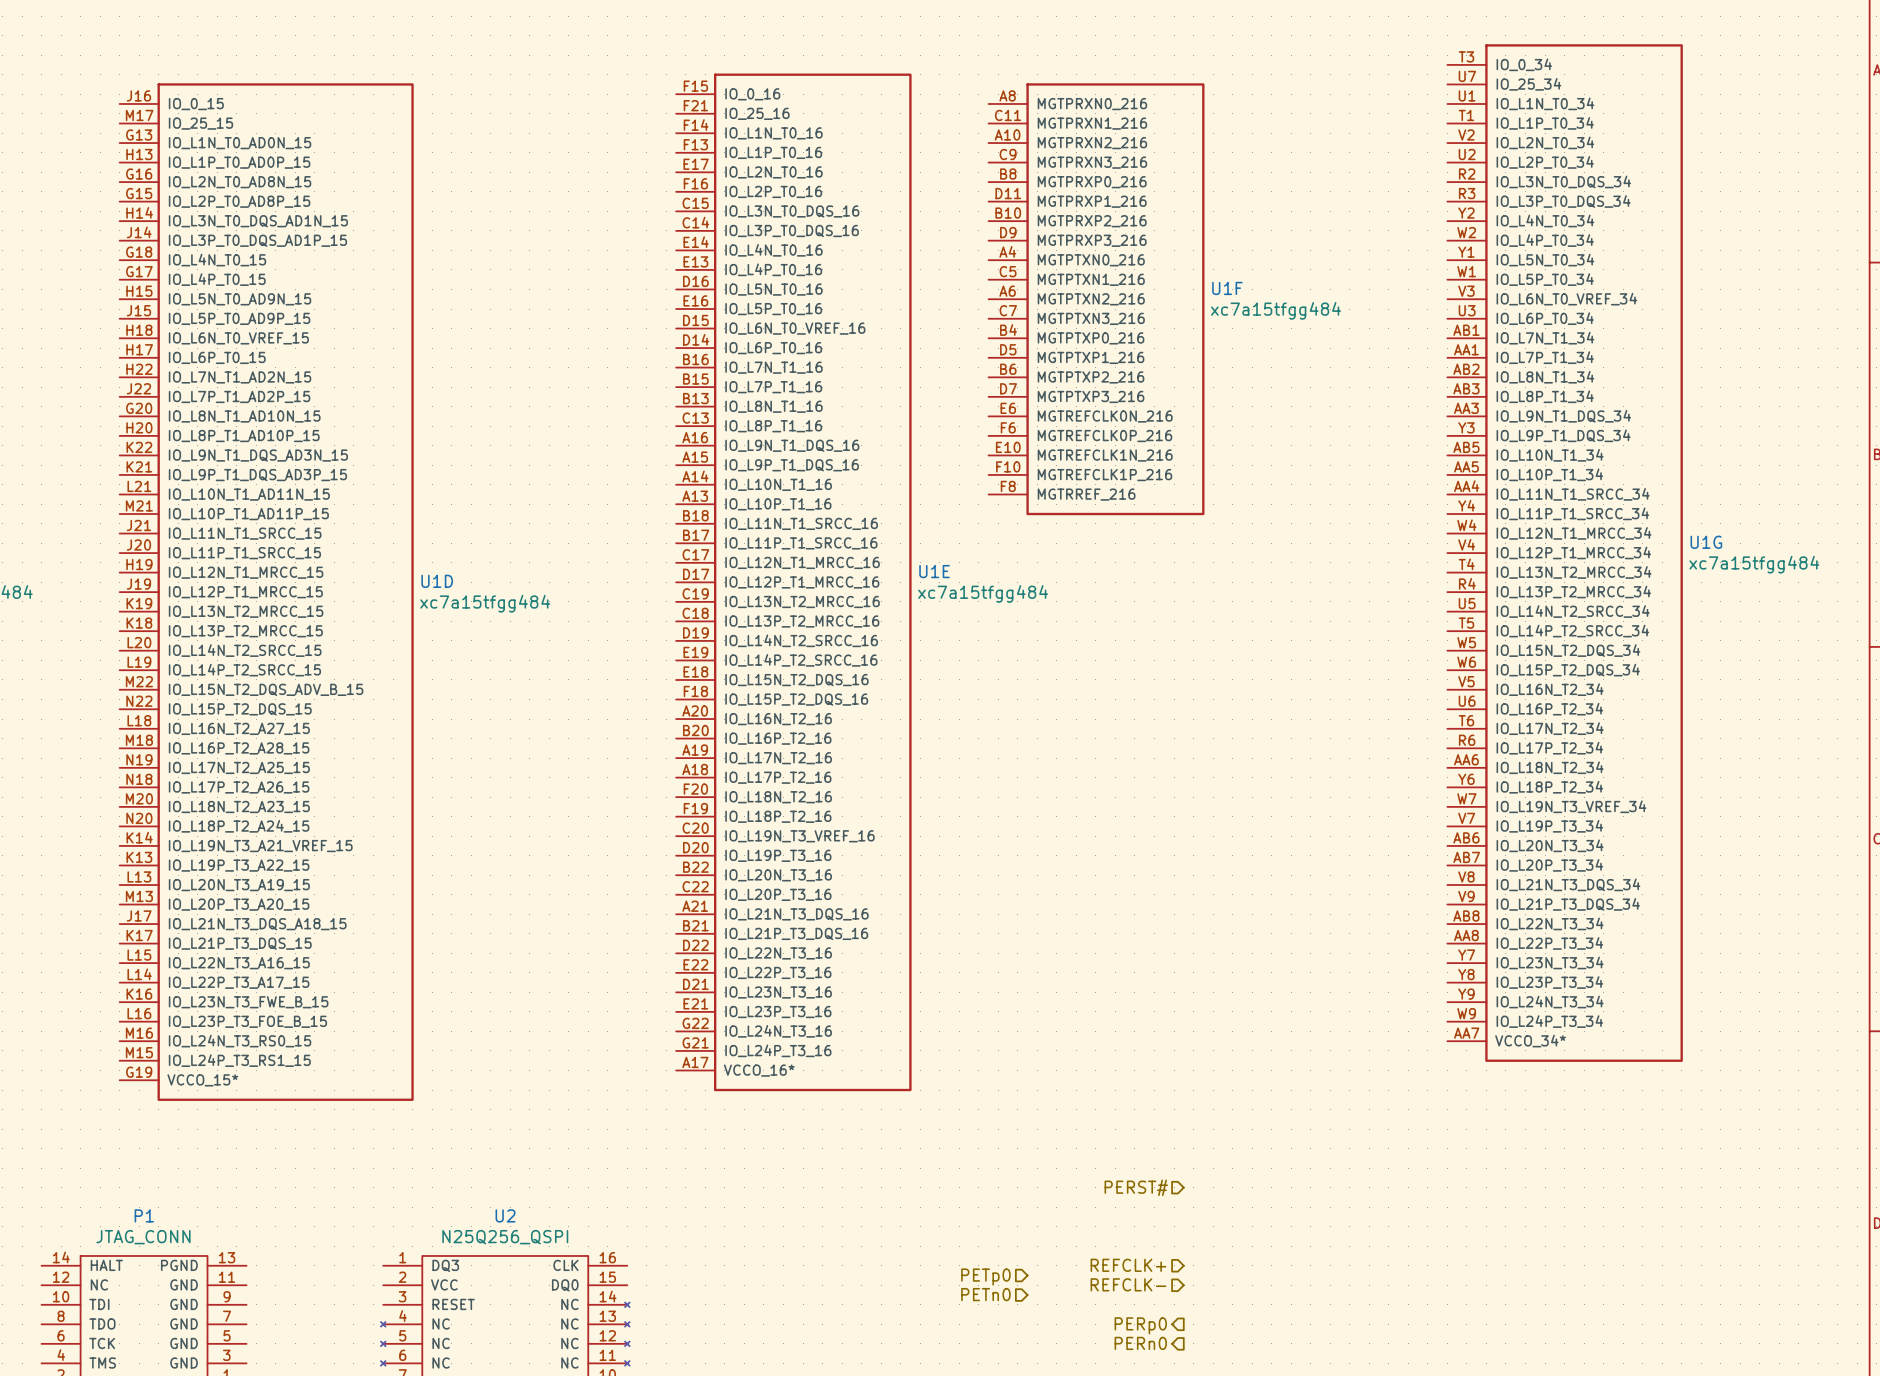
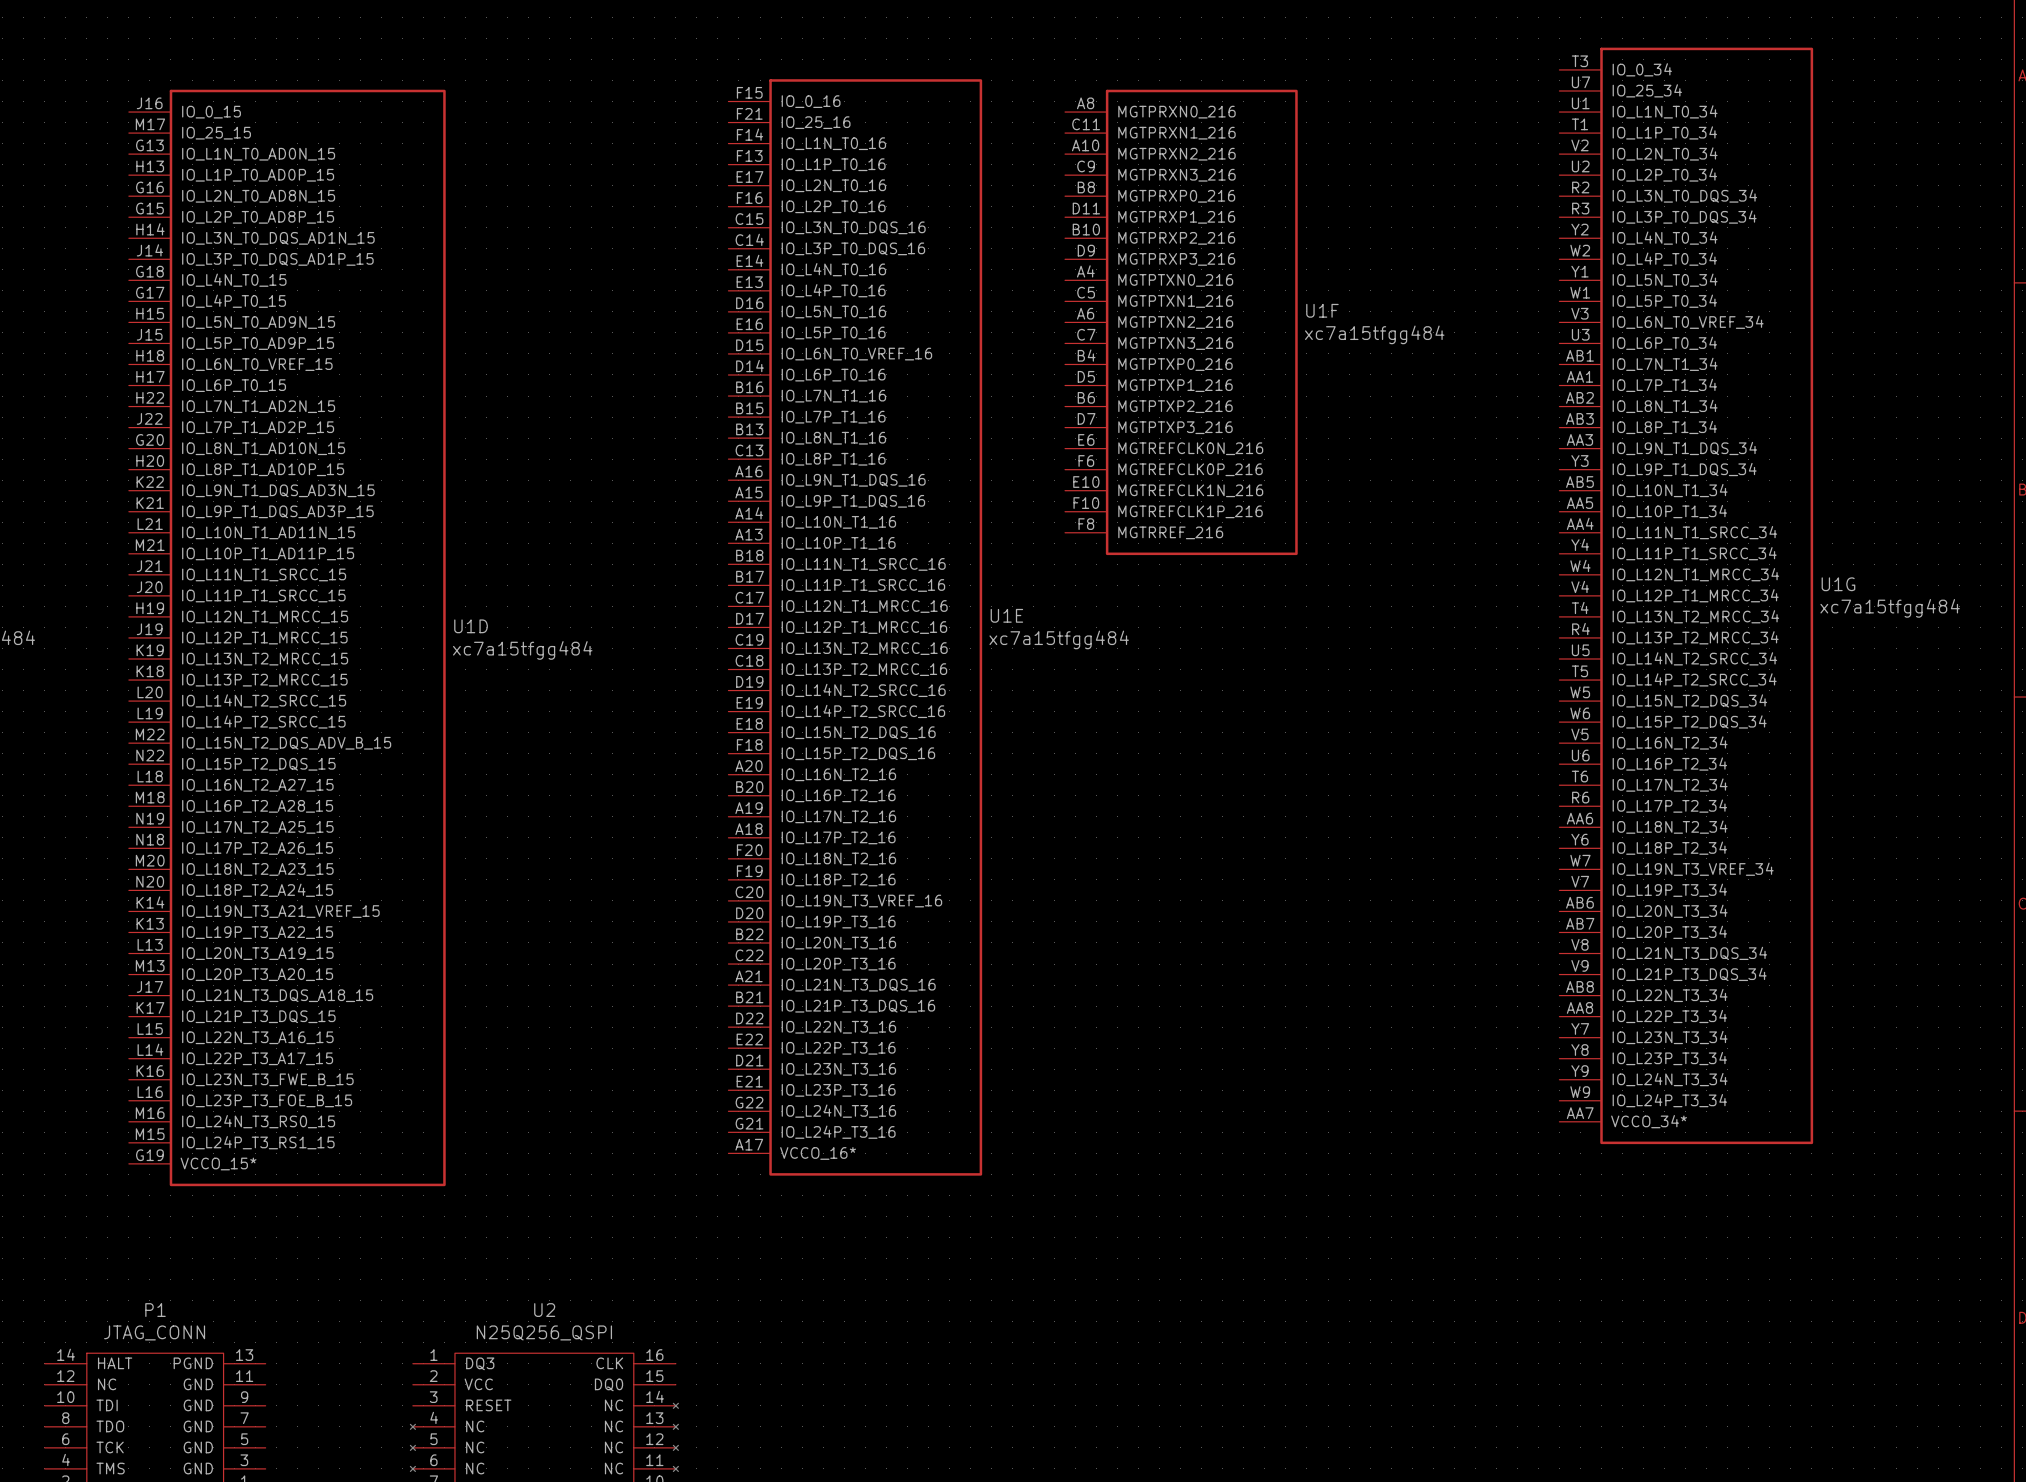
hierarchical label: PERST# (1136, 1187) -> none
hierarchical label: REFCLK+ (1128, 1265) -> none
hierarchical label: PETp0 (985, 1277) -> none
hierarchical label: REFCLK- (1128, 1284) -> none
hierarchical label: PETn0 (985, 1294) -> none
hierarchical label: PERp0 (1140, 1325) -> none
hierarchical label: PERn0 (1140, 1343) -> none

